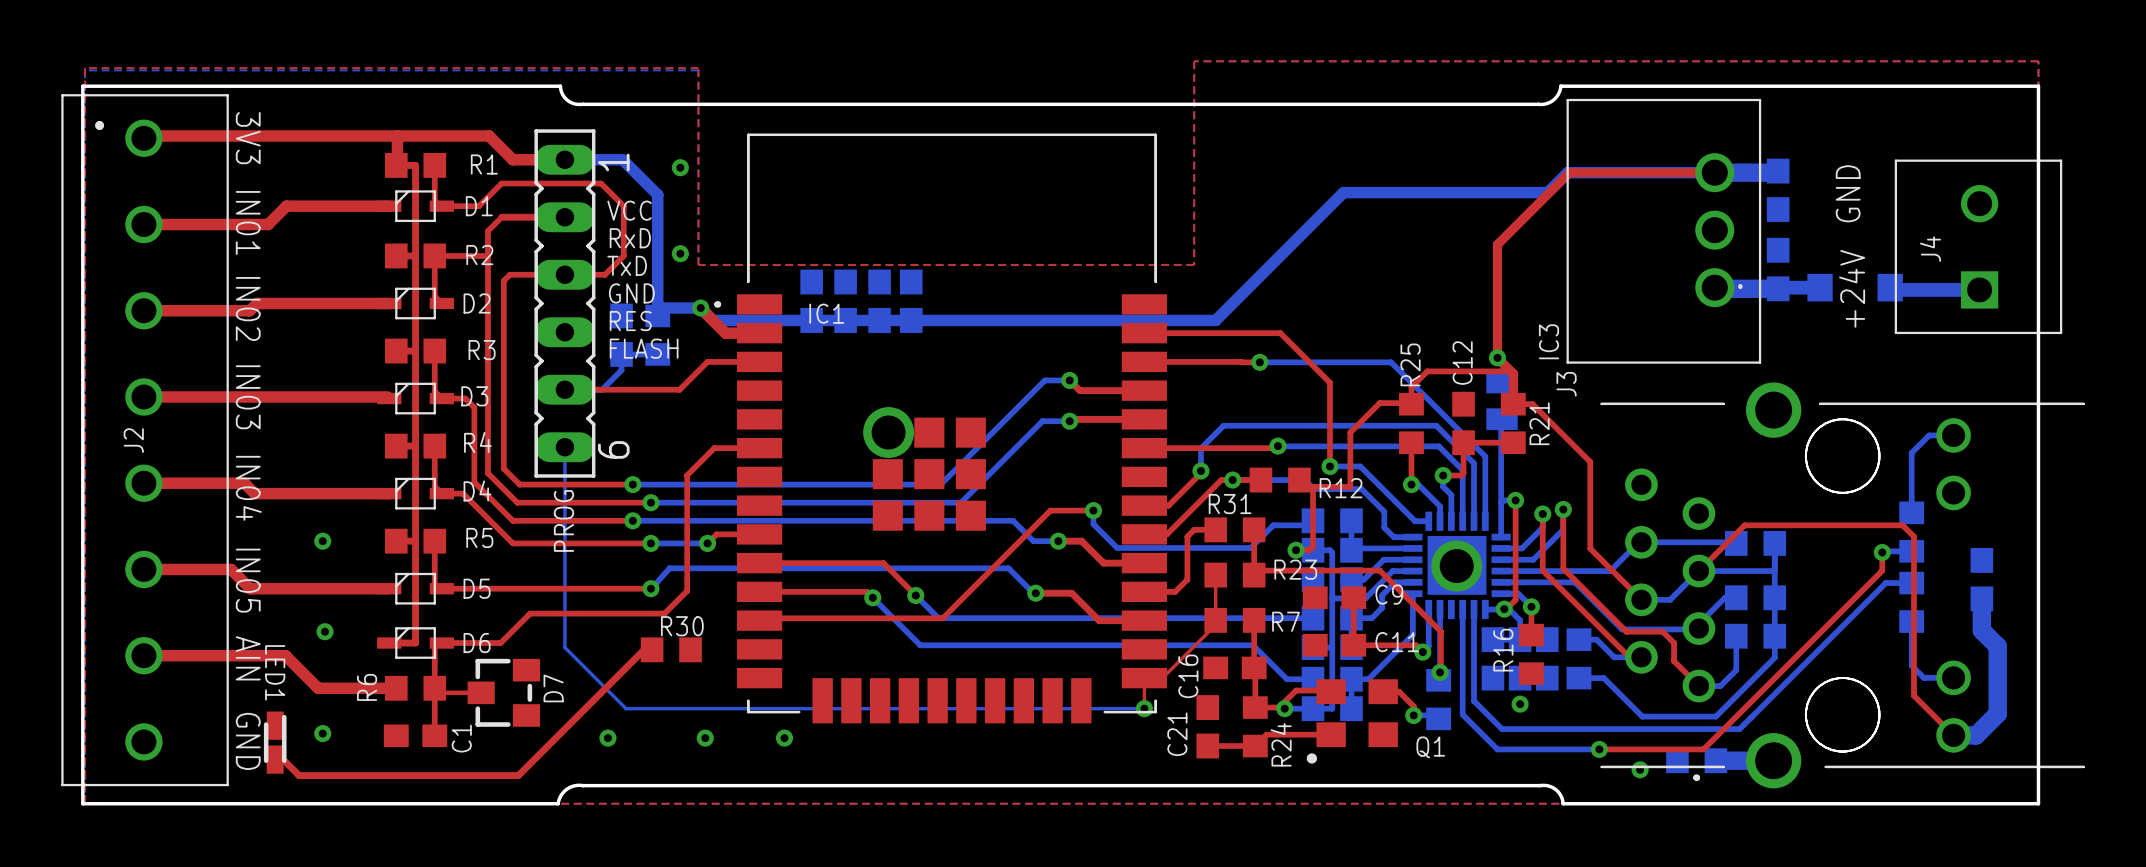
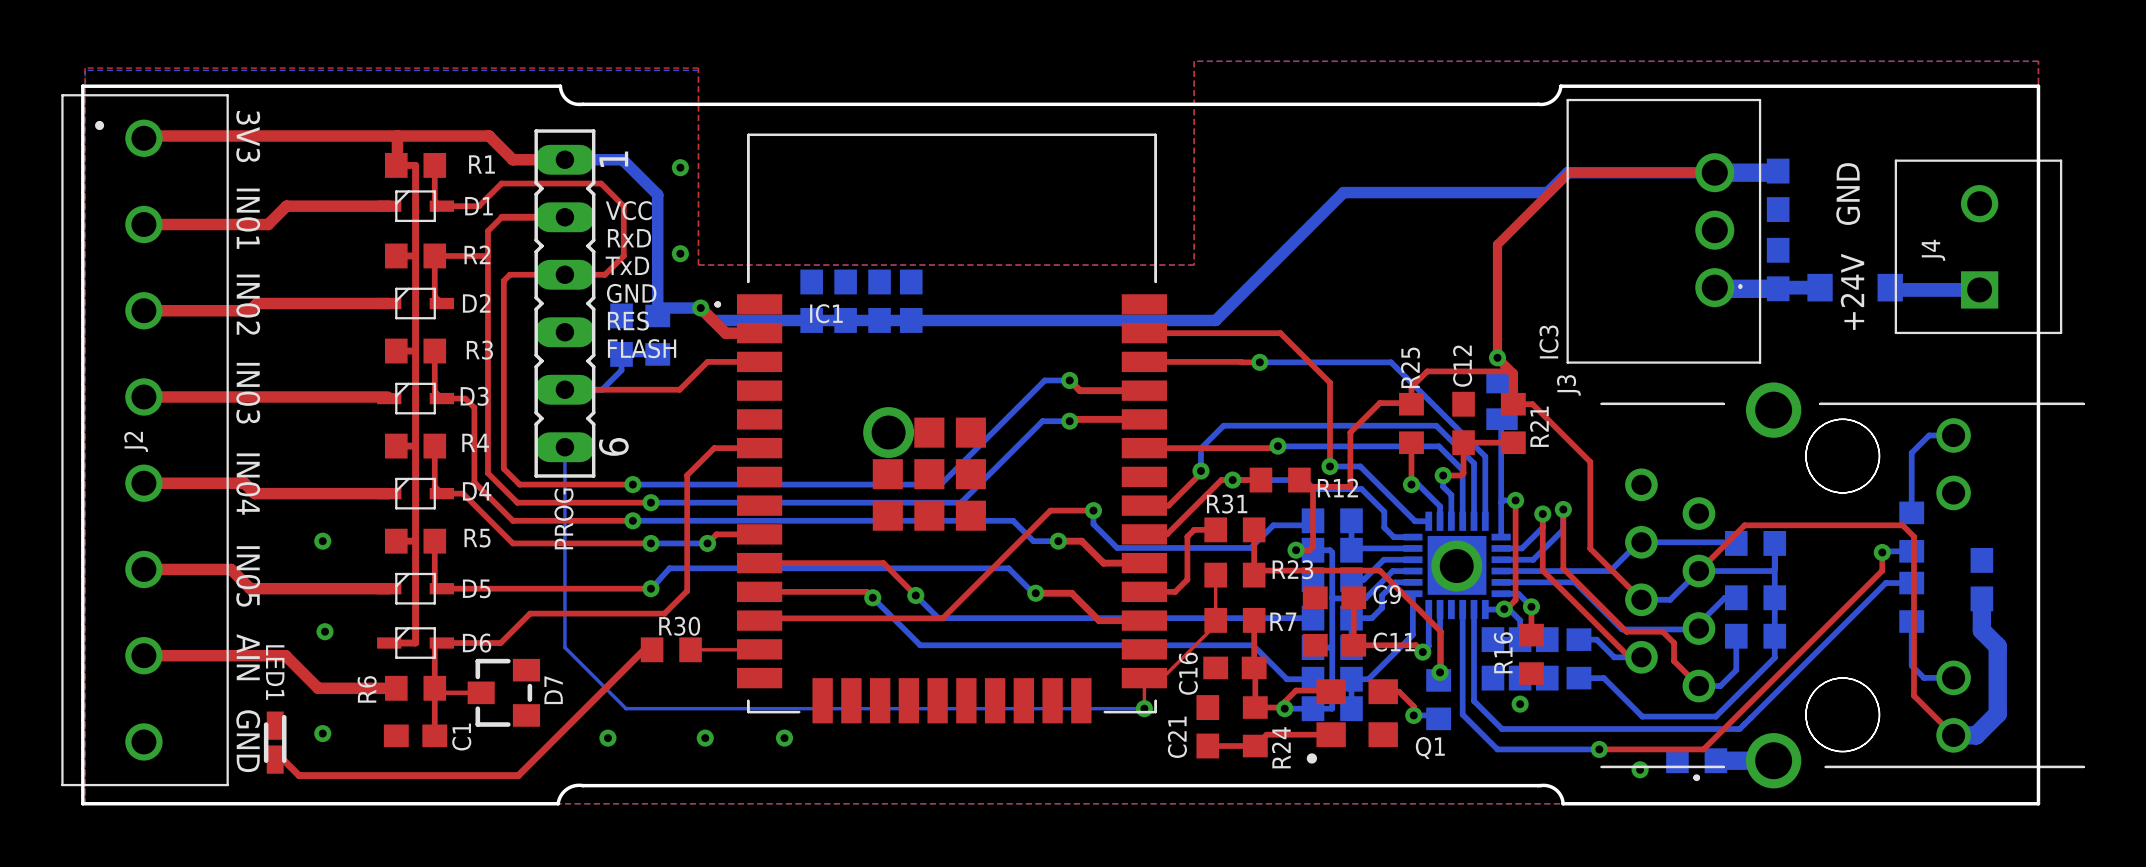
top track: none -> (690, 649) (759, 649)

